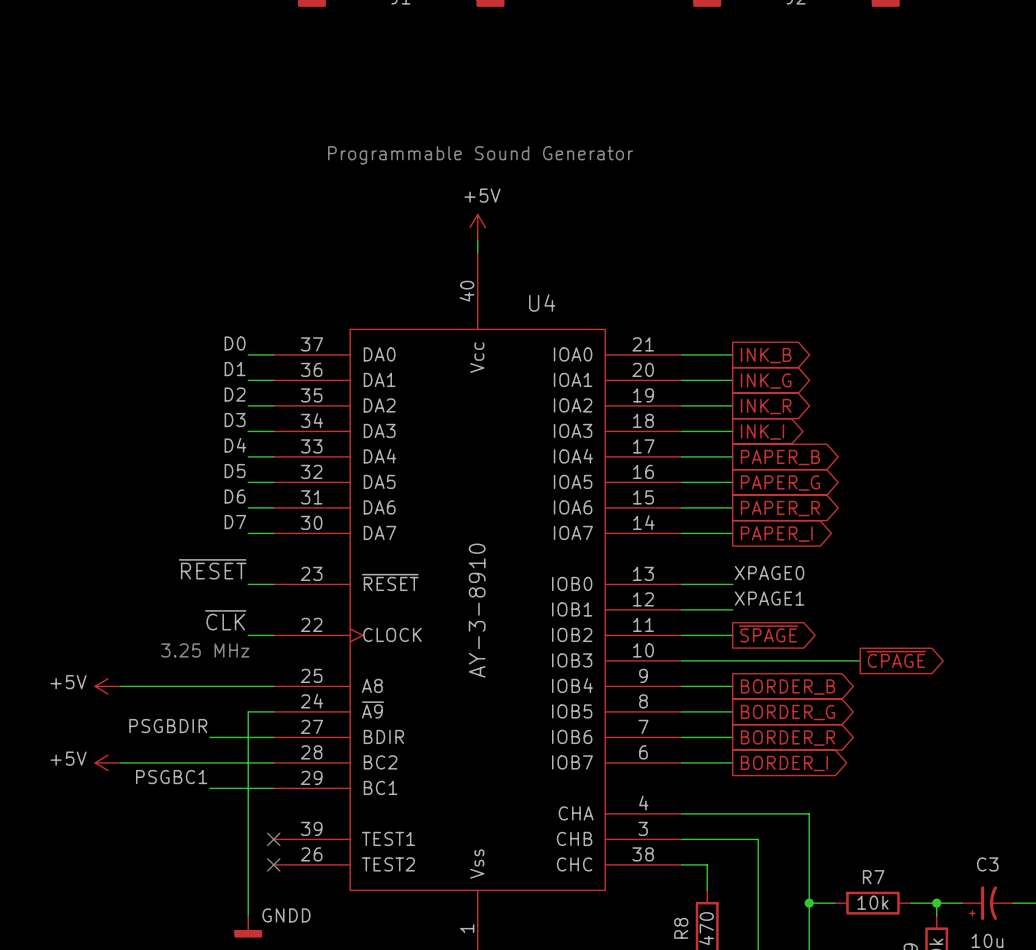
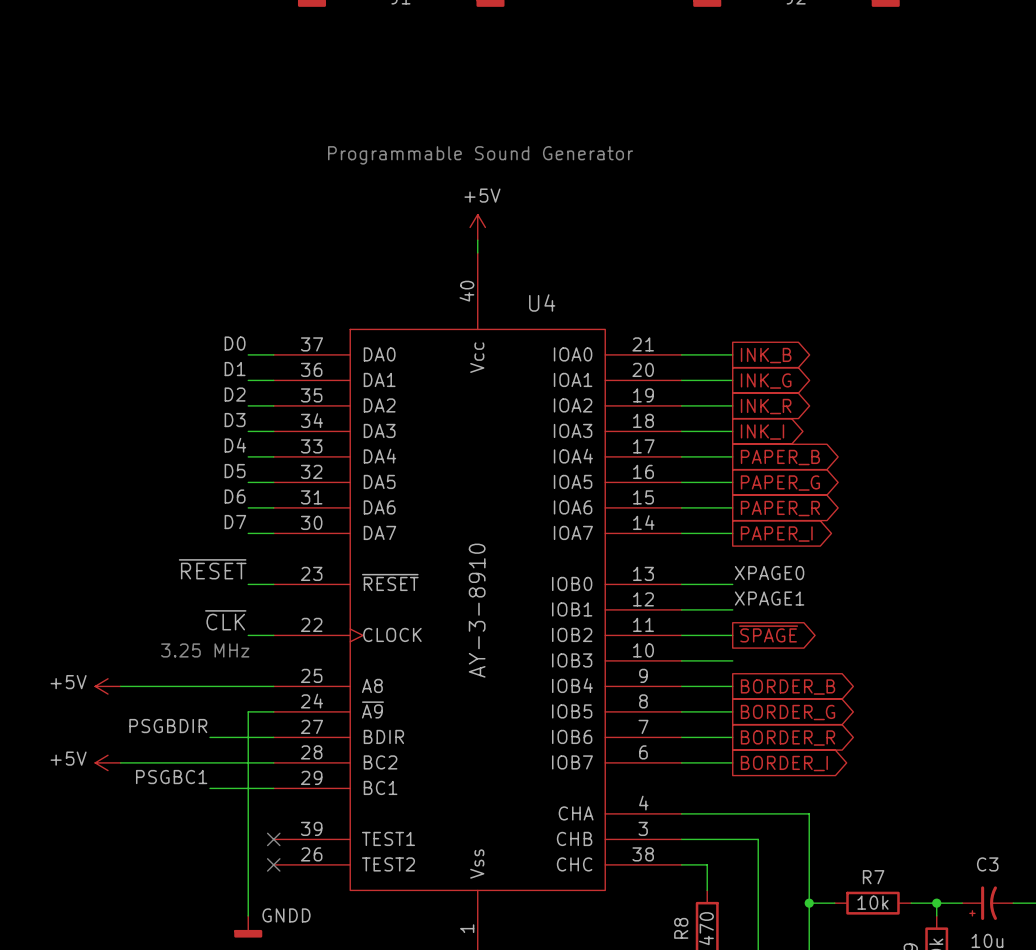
global label: ~{CPAGE} (896, 659) -> none
wire: (732, 660) (860, 660) -> none

